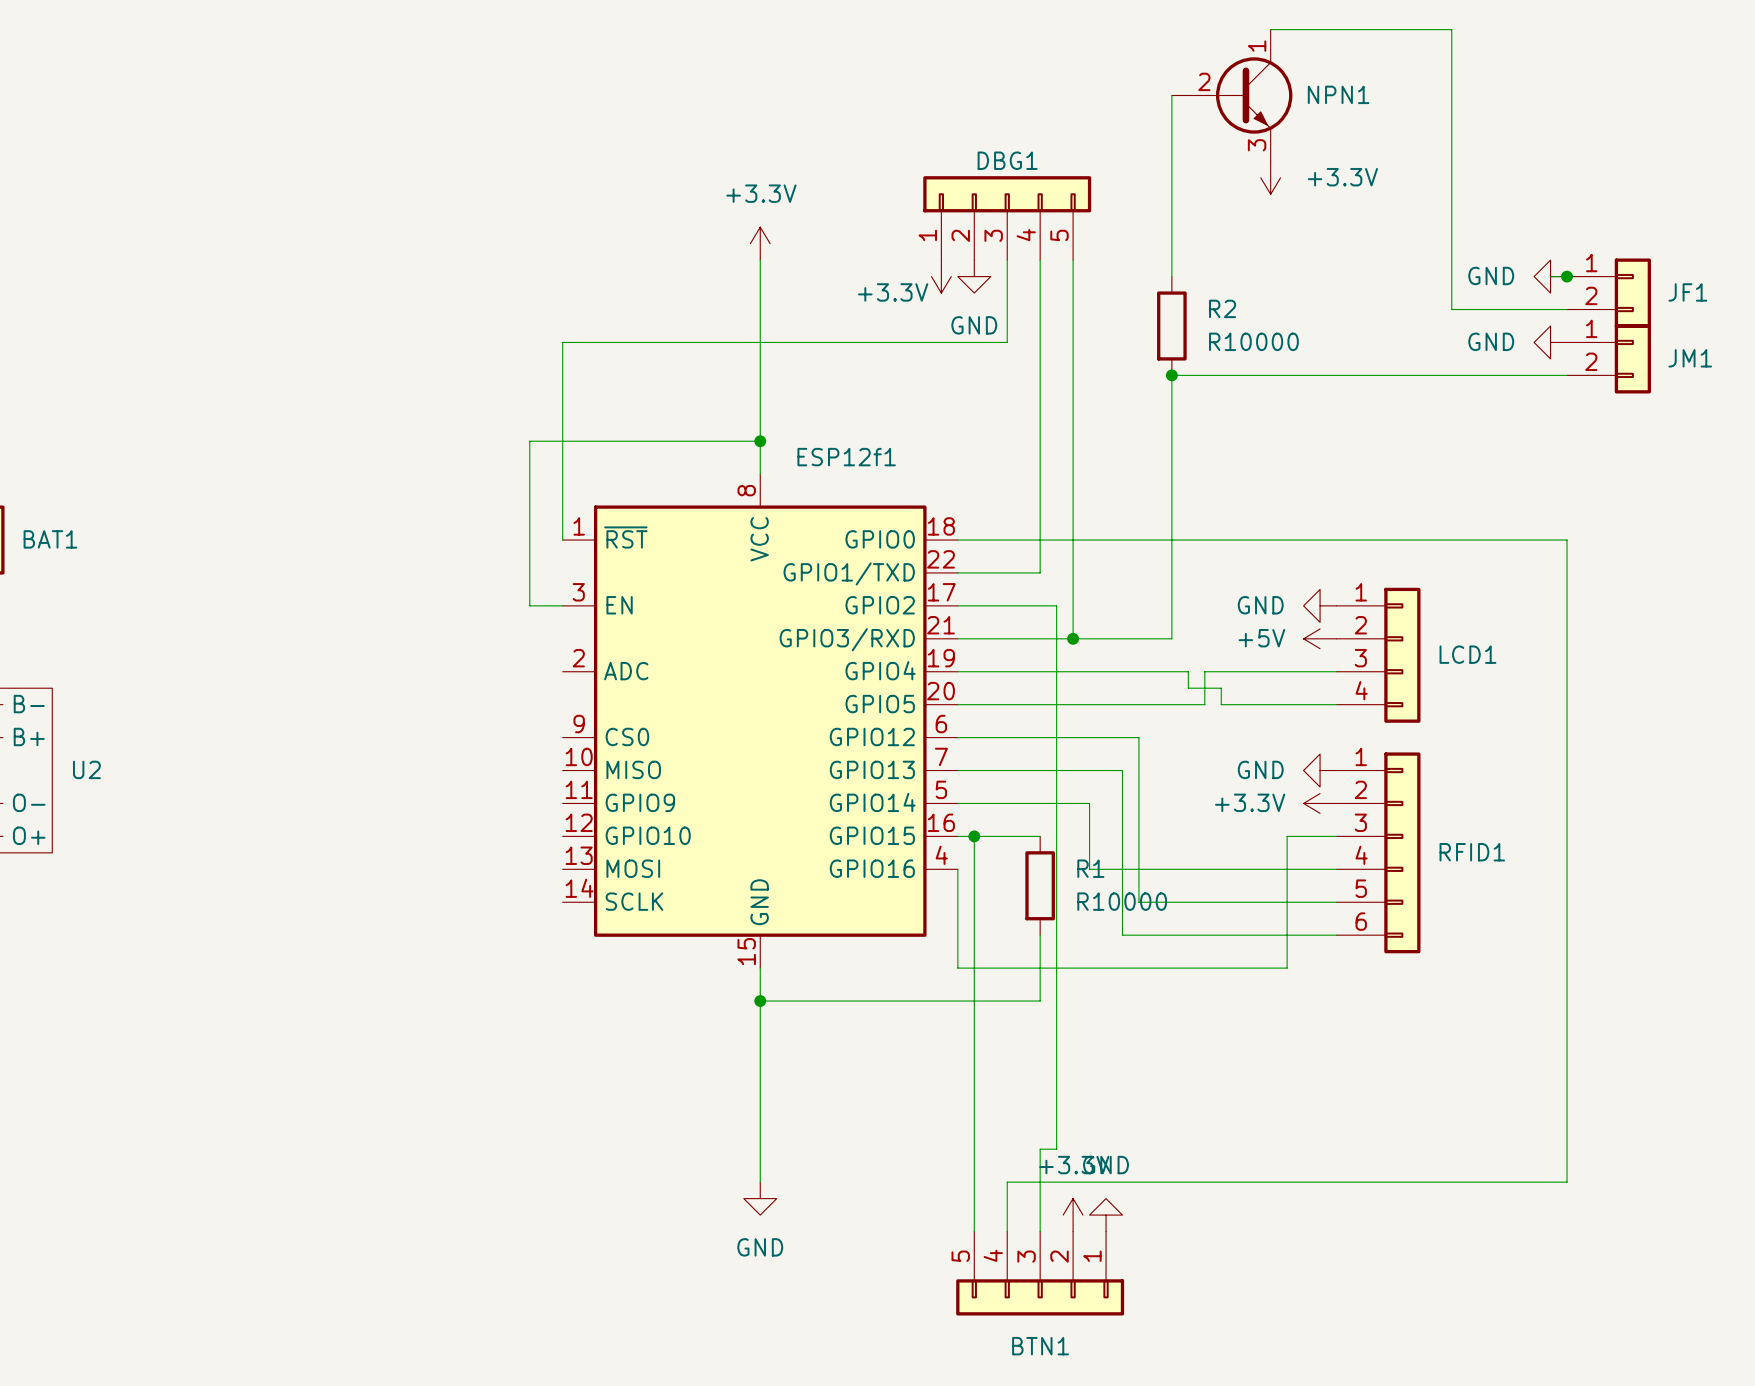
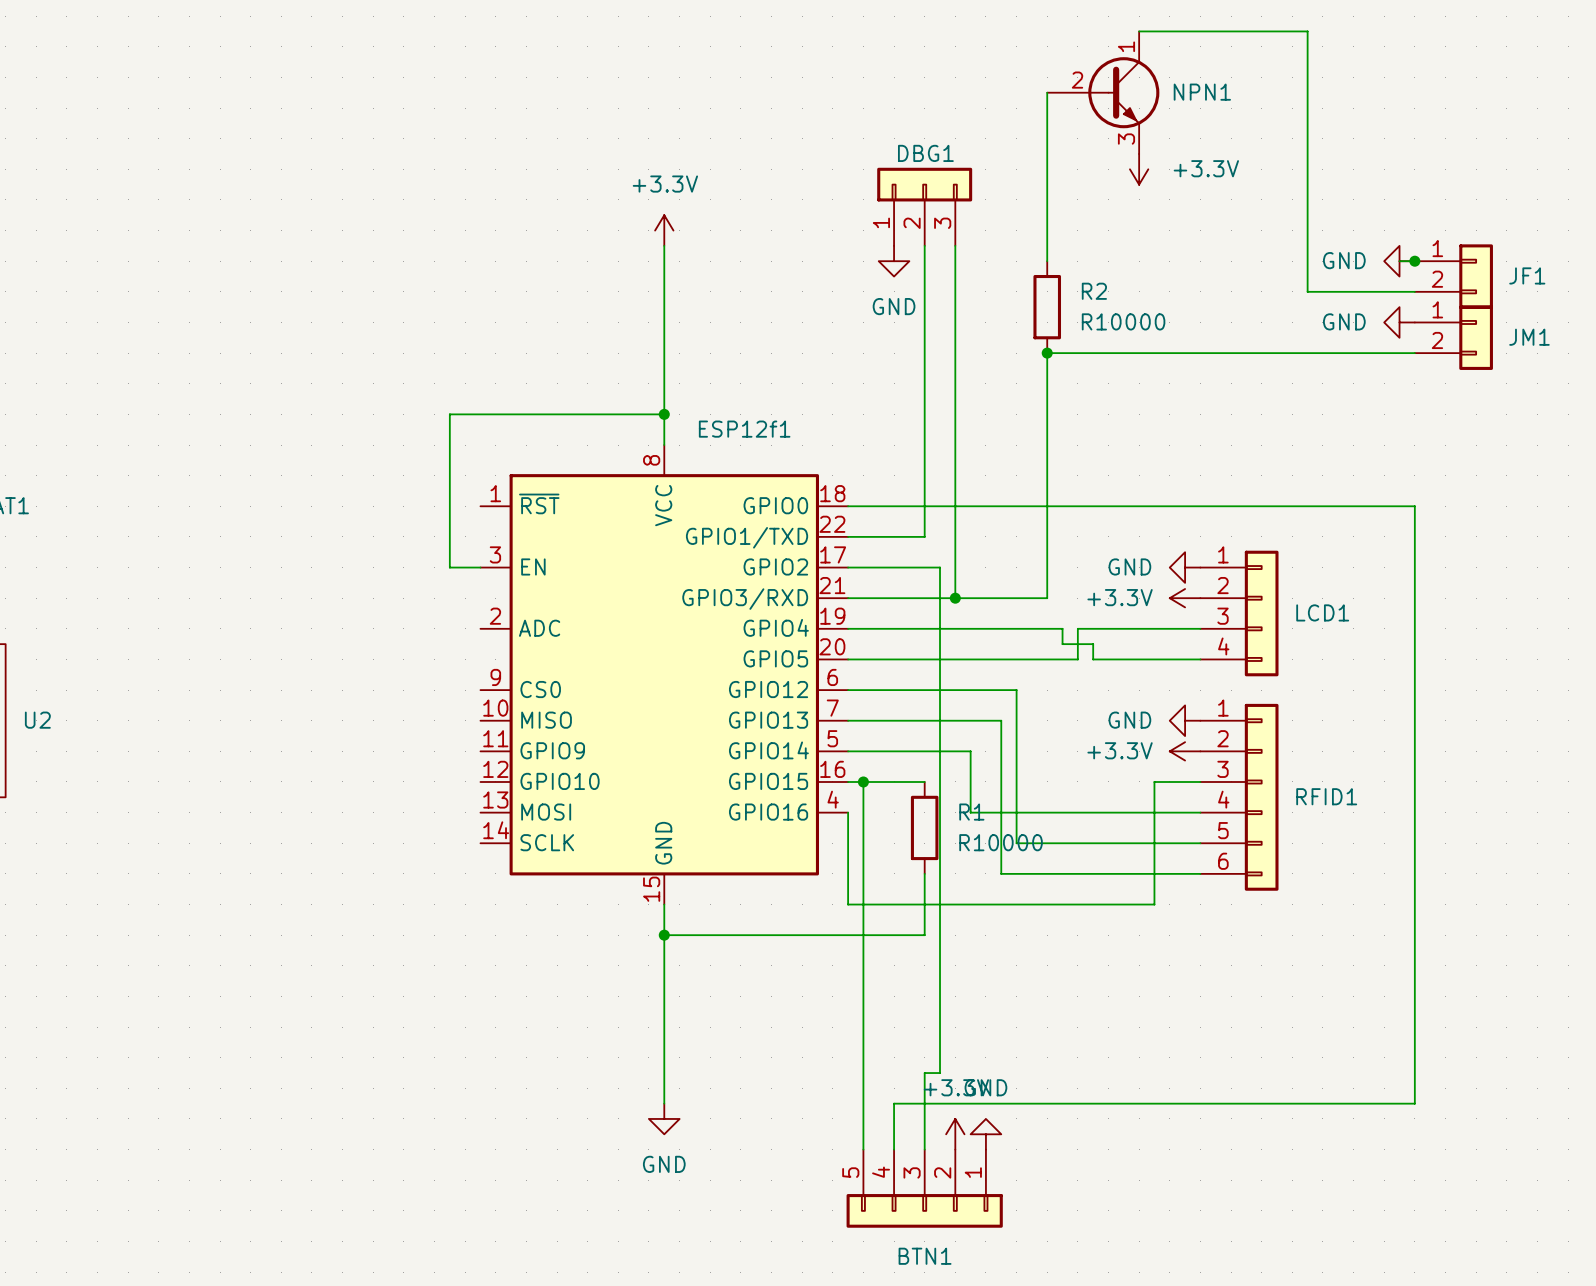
DBG1 symbol: [923, 176, 1092, 261] -> [877, 167, 973, 246]
wire: (1007, 260) (1007, 342) (562, 342) (562, 540) -> none
power symbol: +3.3V (941, 276) -> none
power symbol position: GND (974, 276) -> GND (894, 261)
power symbol: +5V (1320, 638) -> +3.3V (1185, 598)

